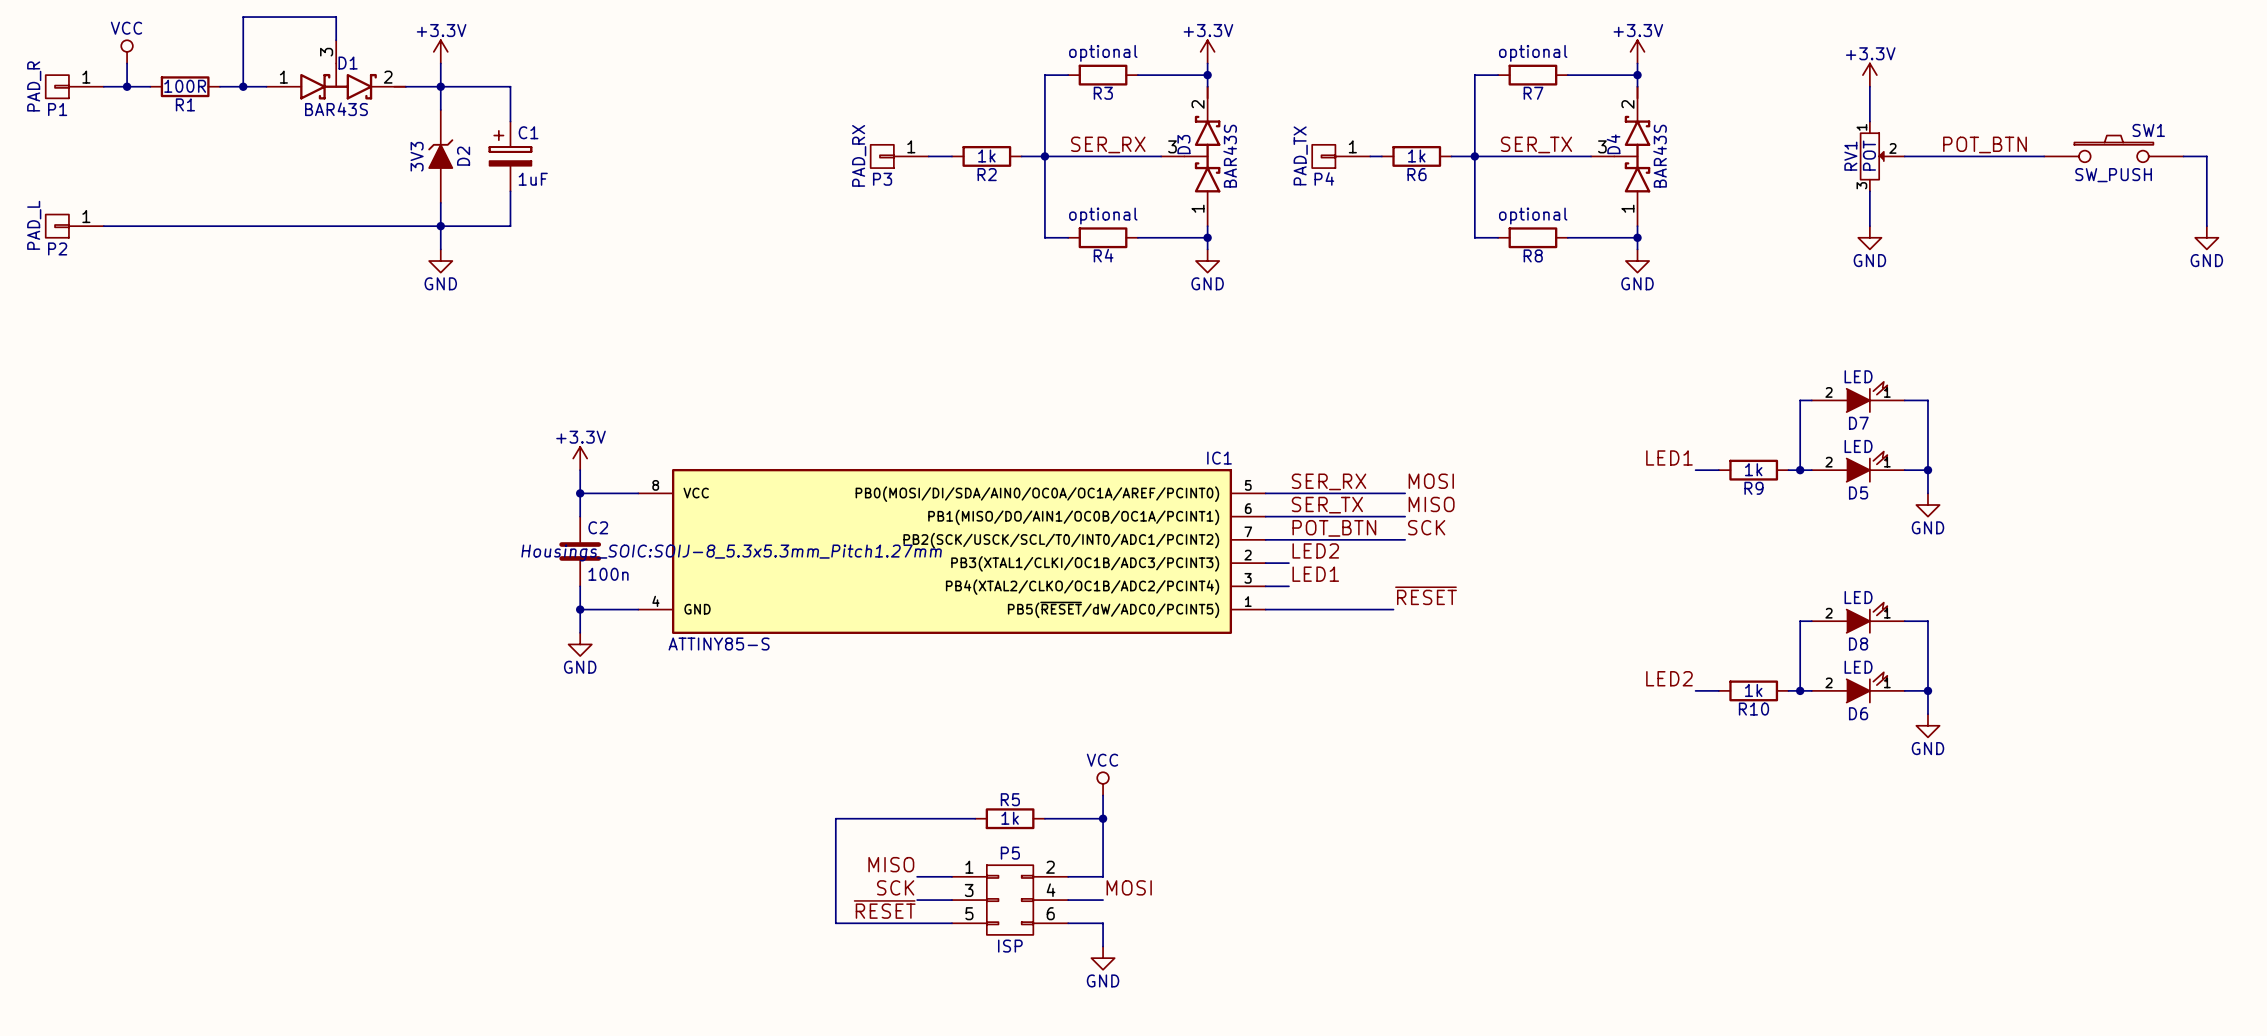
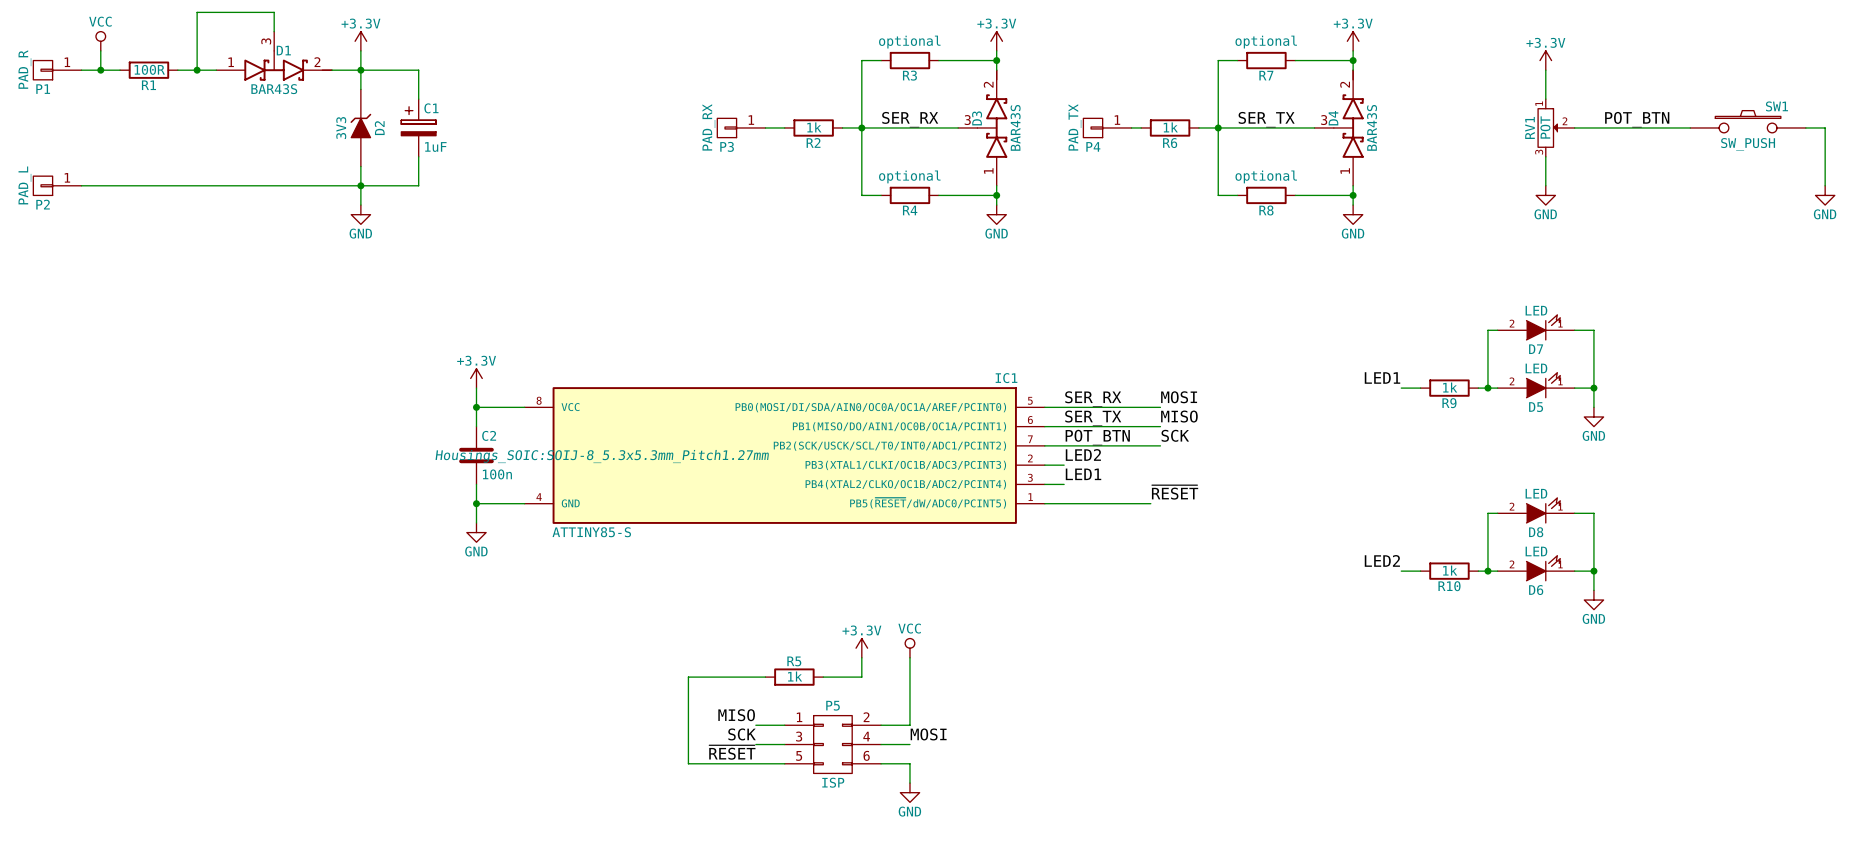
power symbol: none -> +3.3V (861, 648)
wire: none -> (861, 657) (861, 677) (823, 677)
wire: (928, 818) (975, 818) -> none
R5 position: (1010, 818) -> (794, 677)
wire: (1044, 818) (1103, 818) -> none
junction: (1103, 818) -> none

